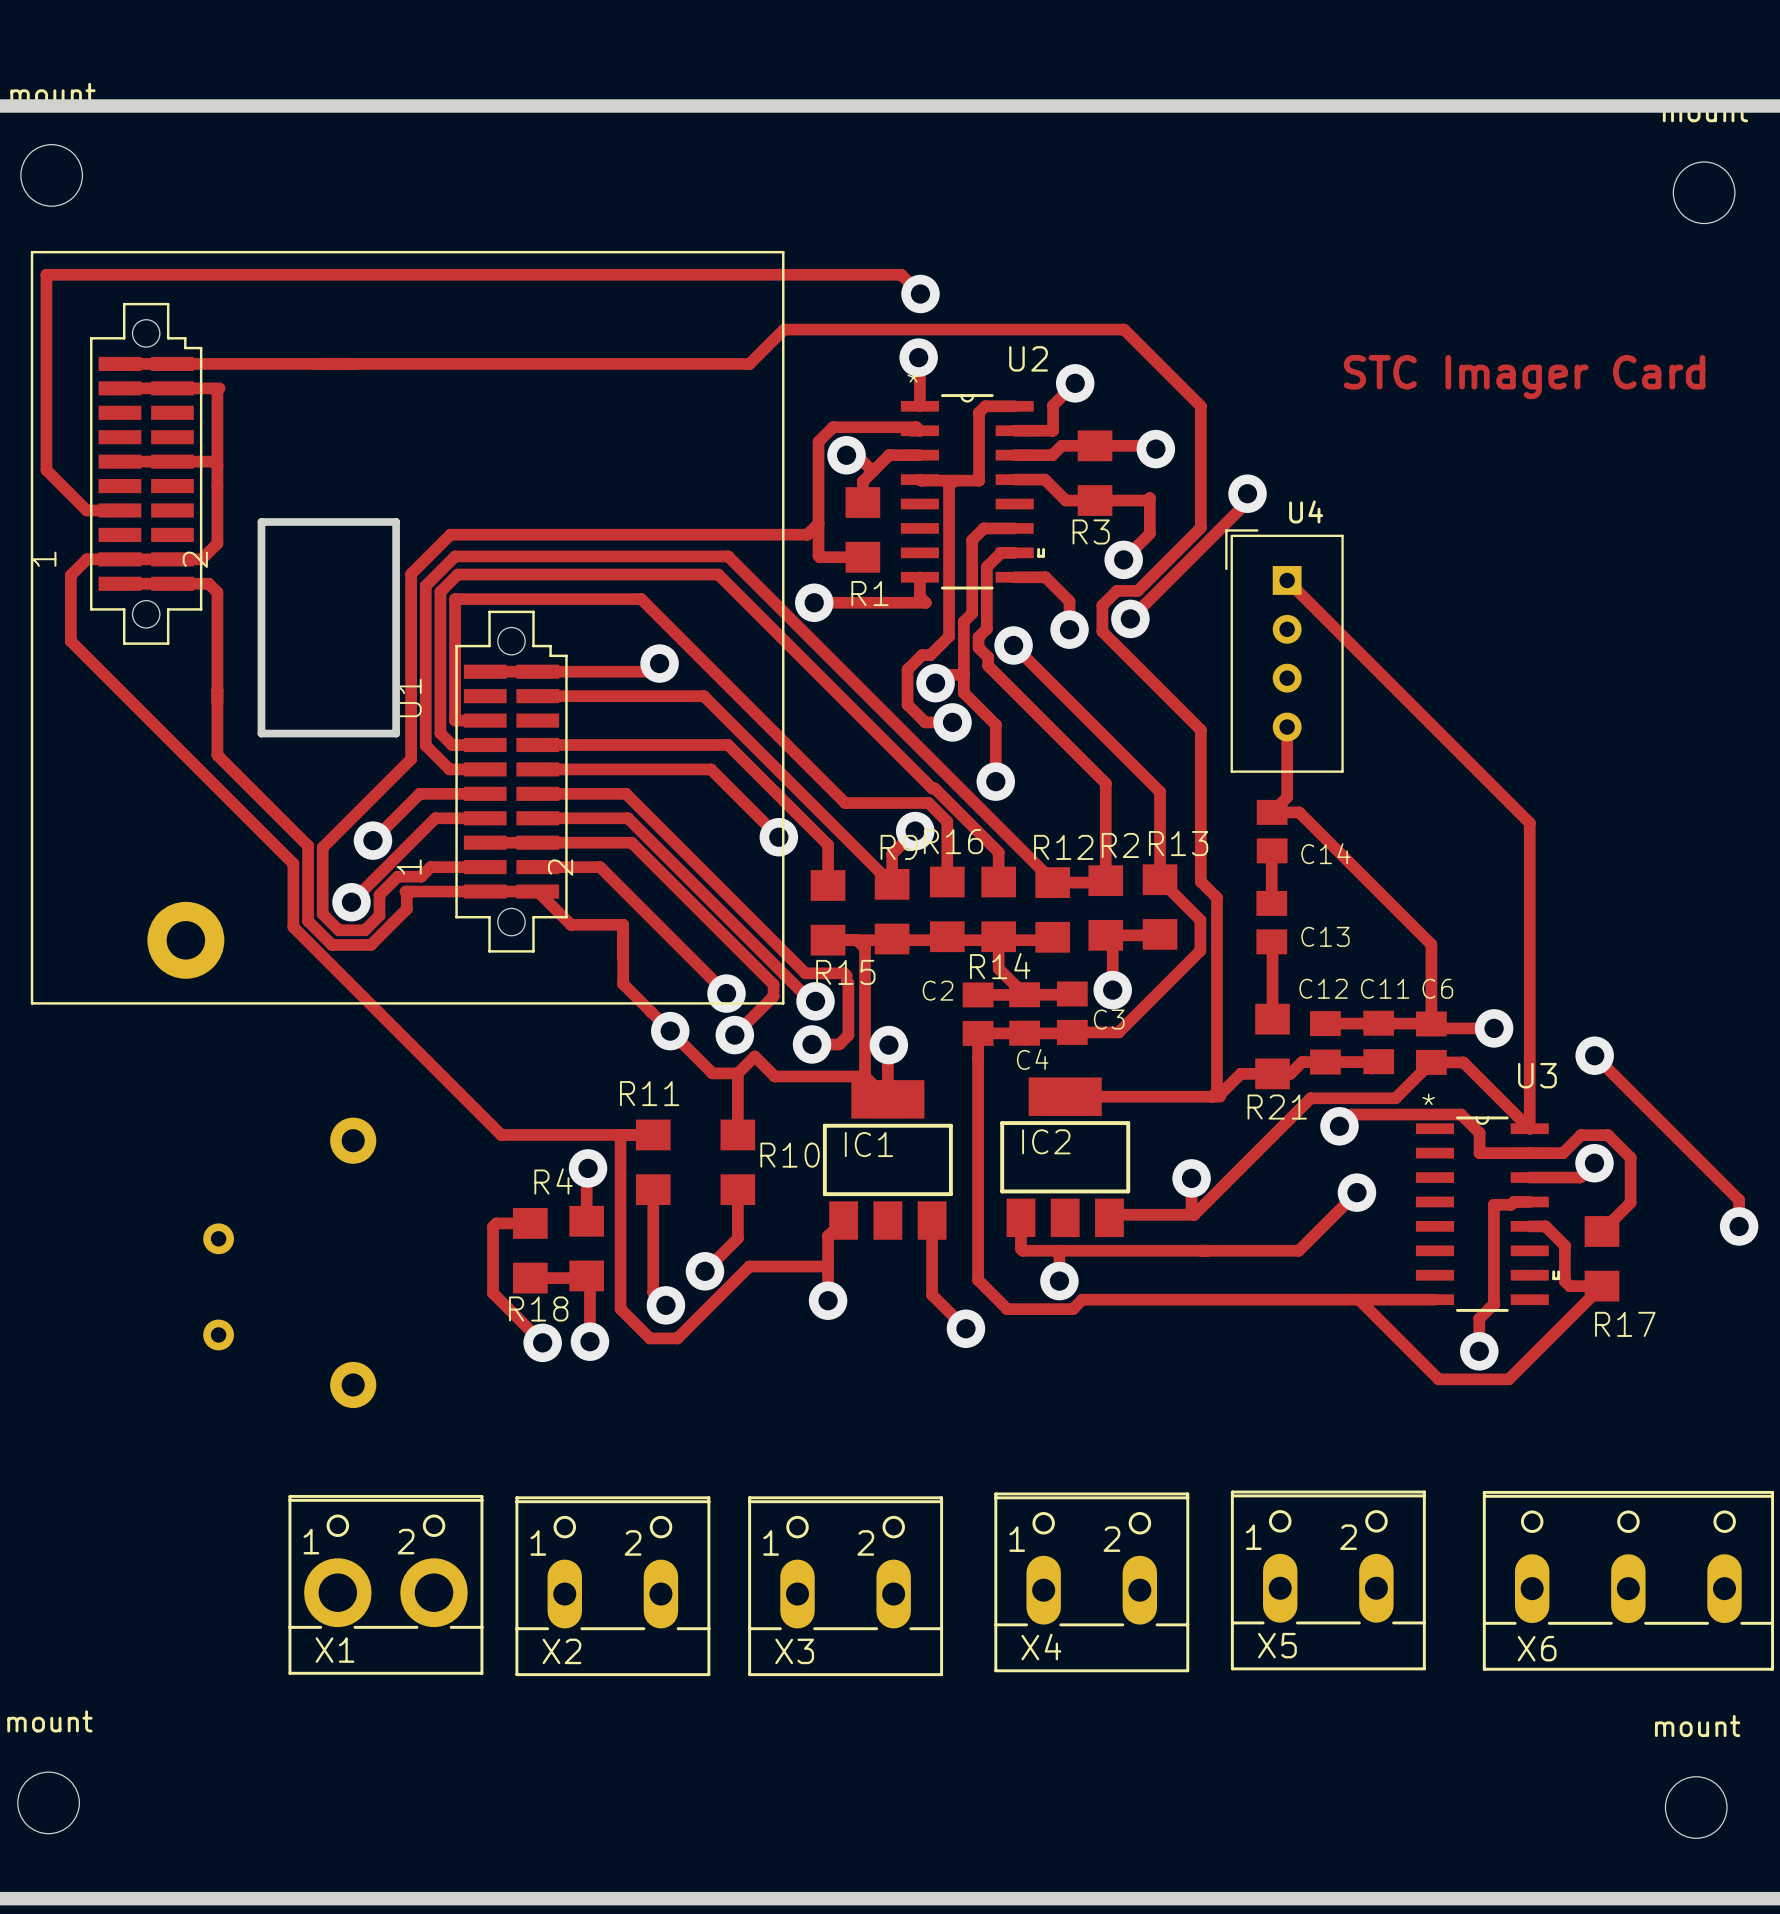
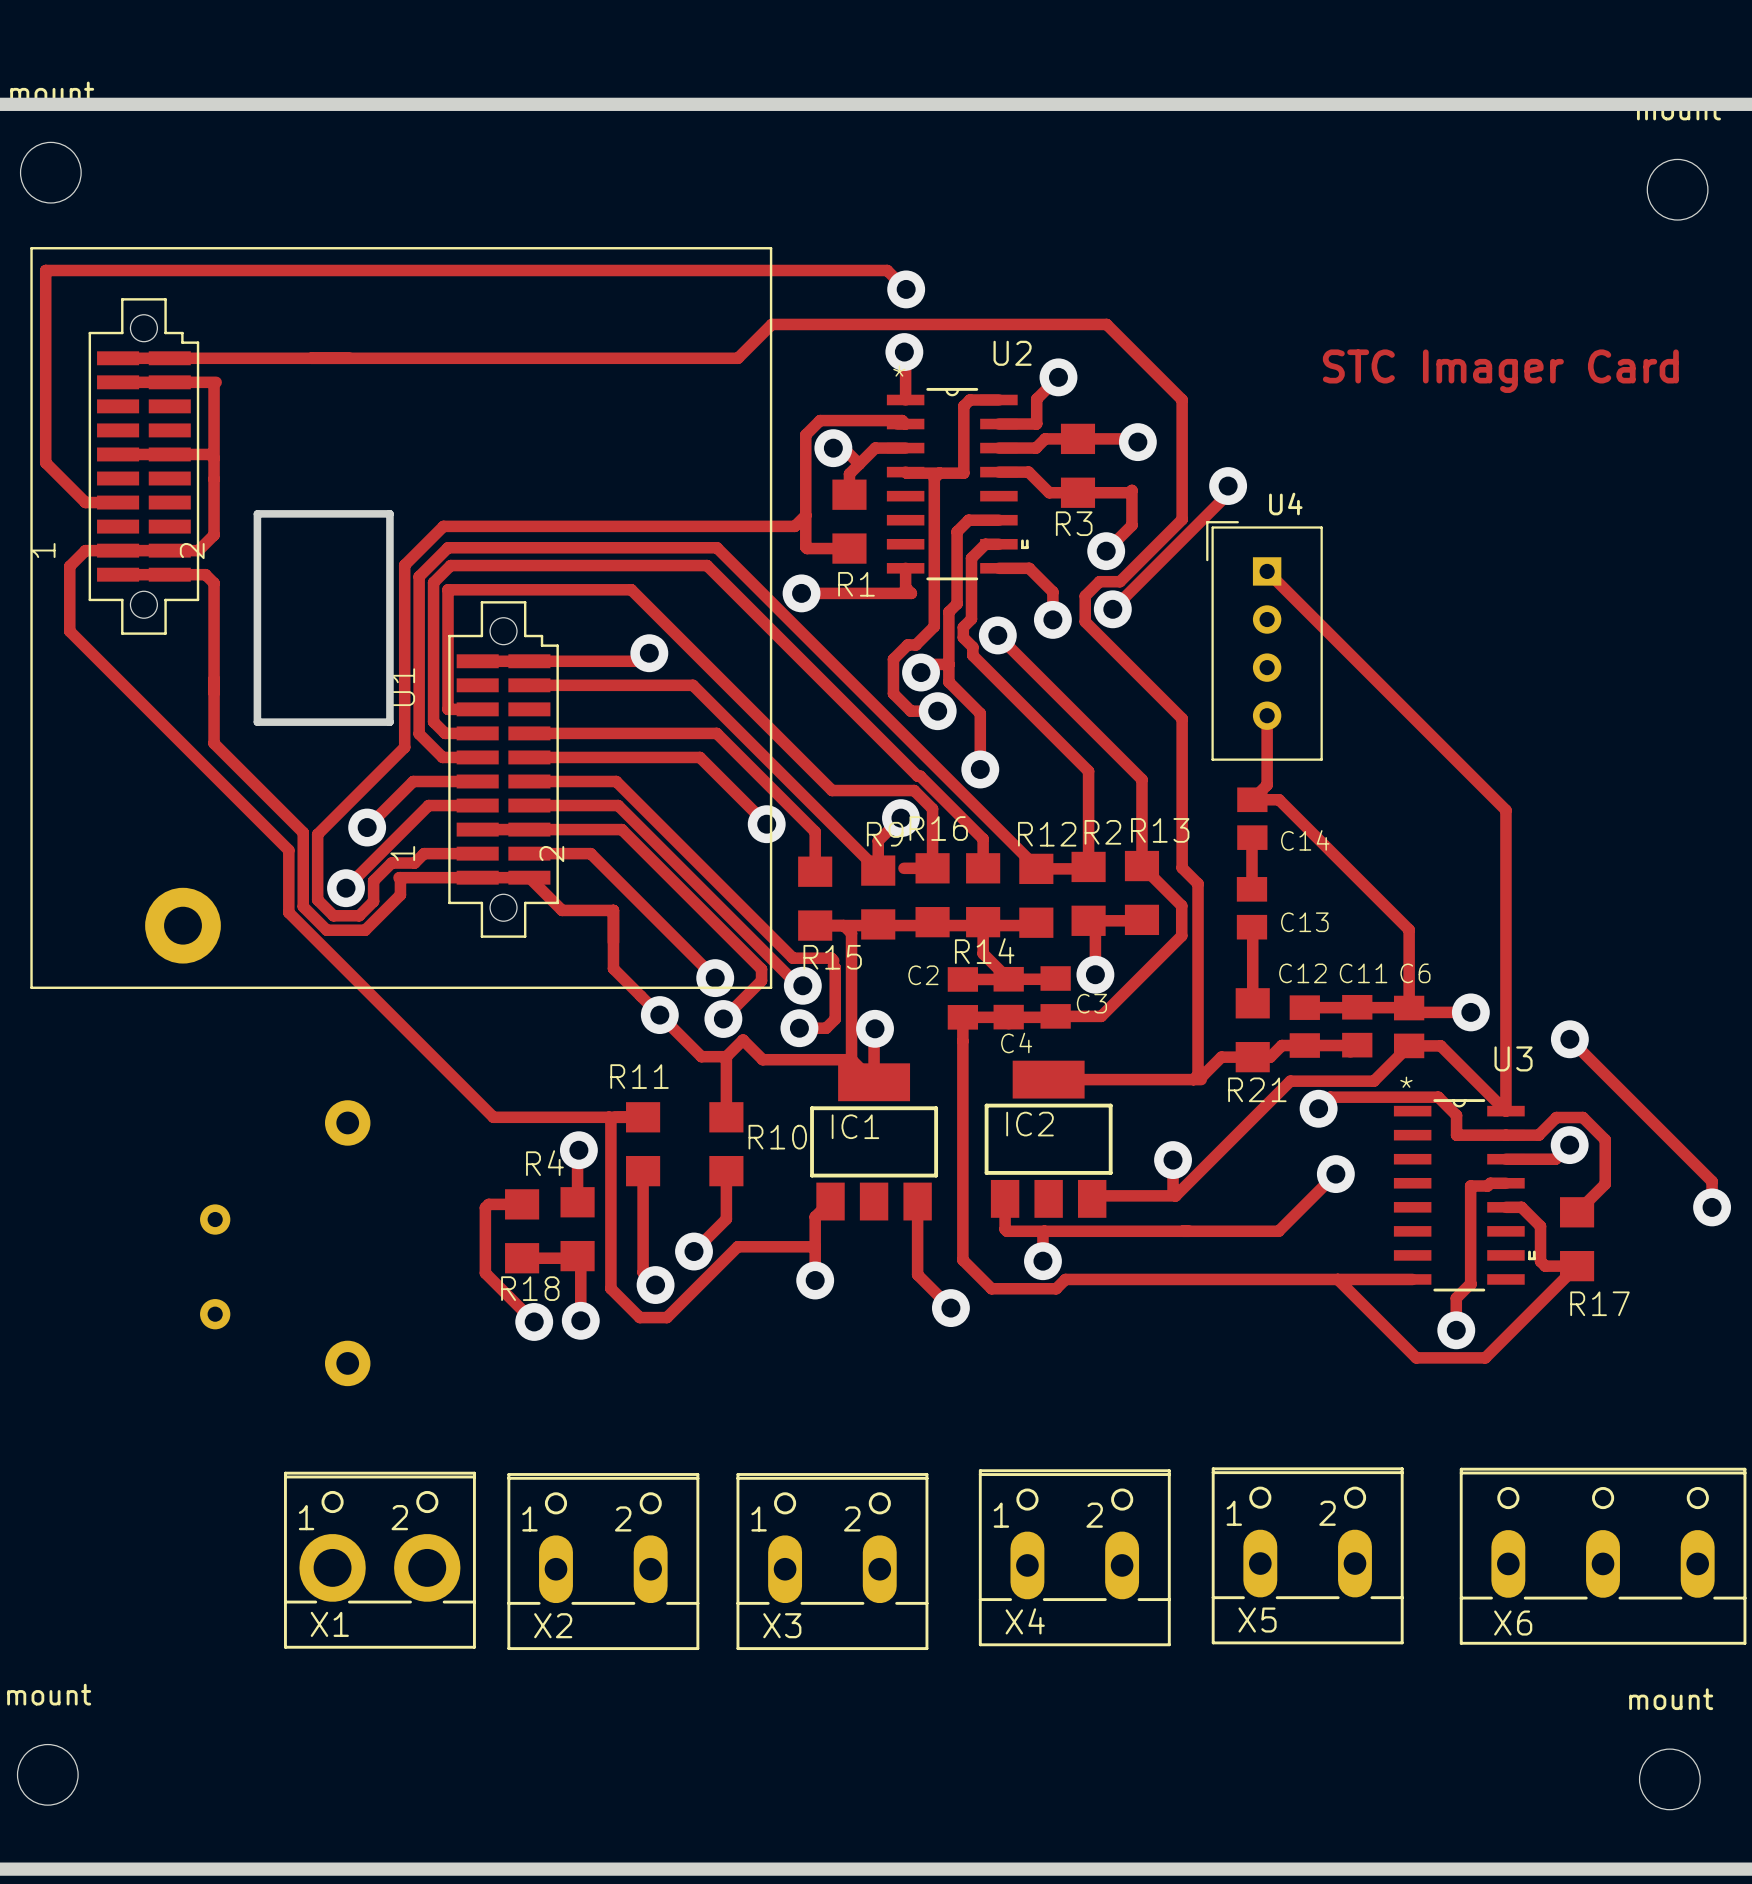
track: none -> (903, 868) (932, 868)

